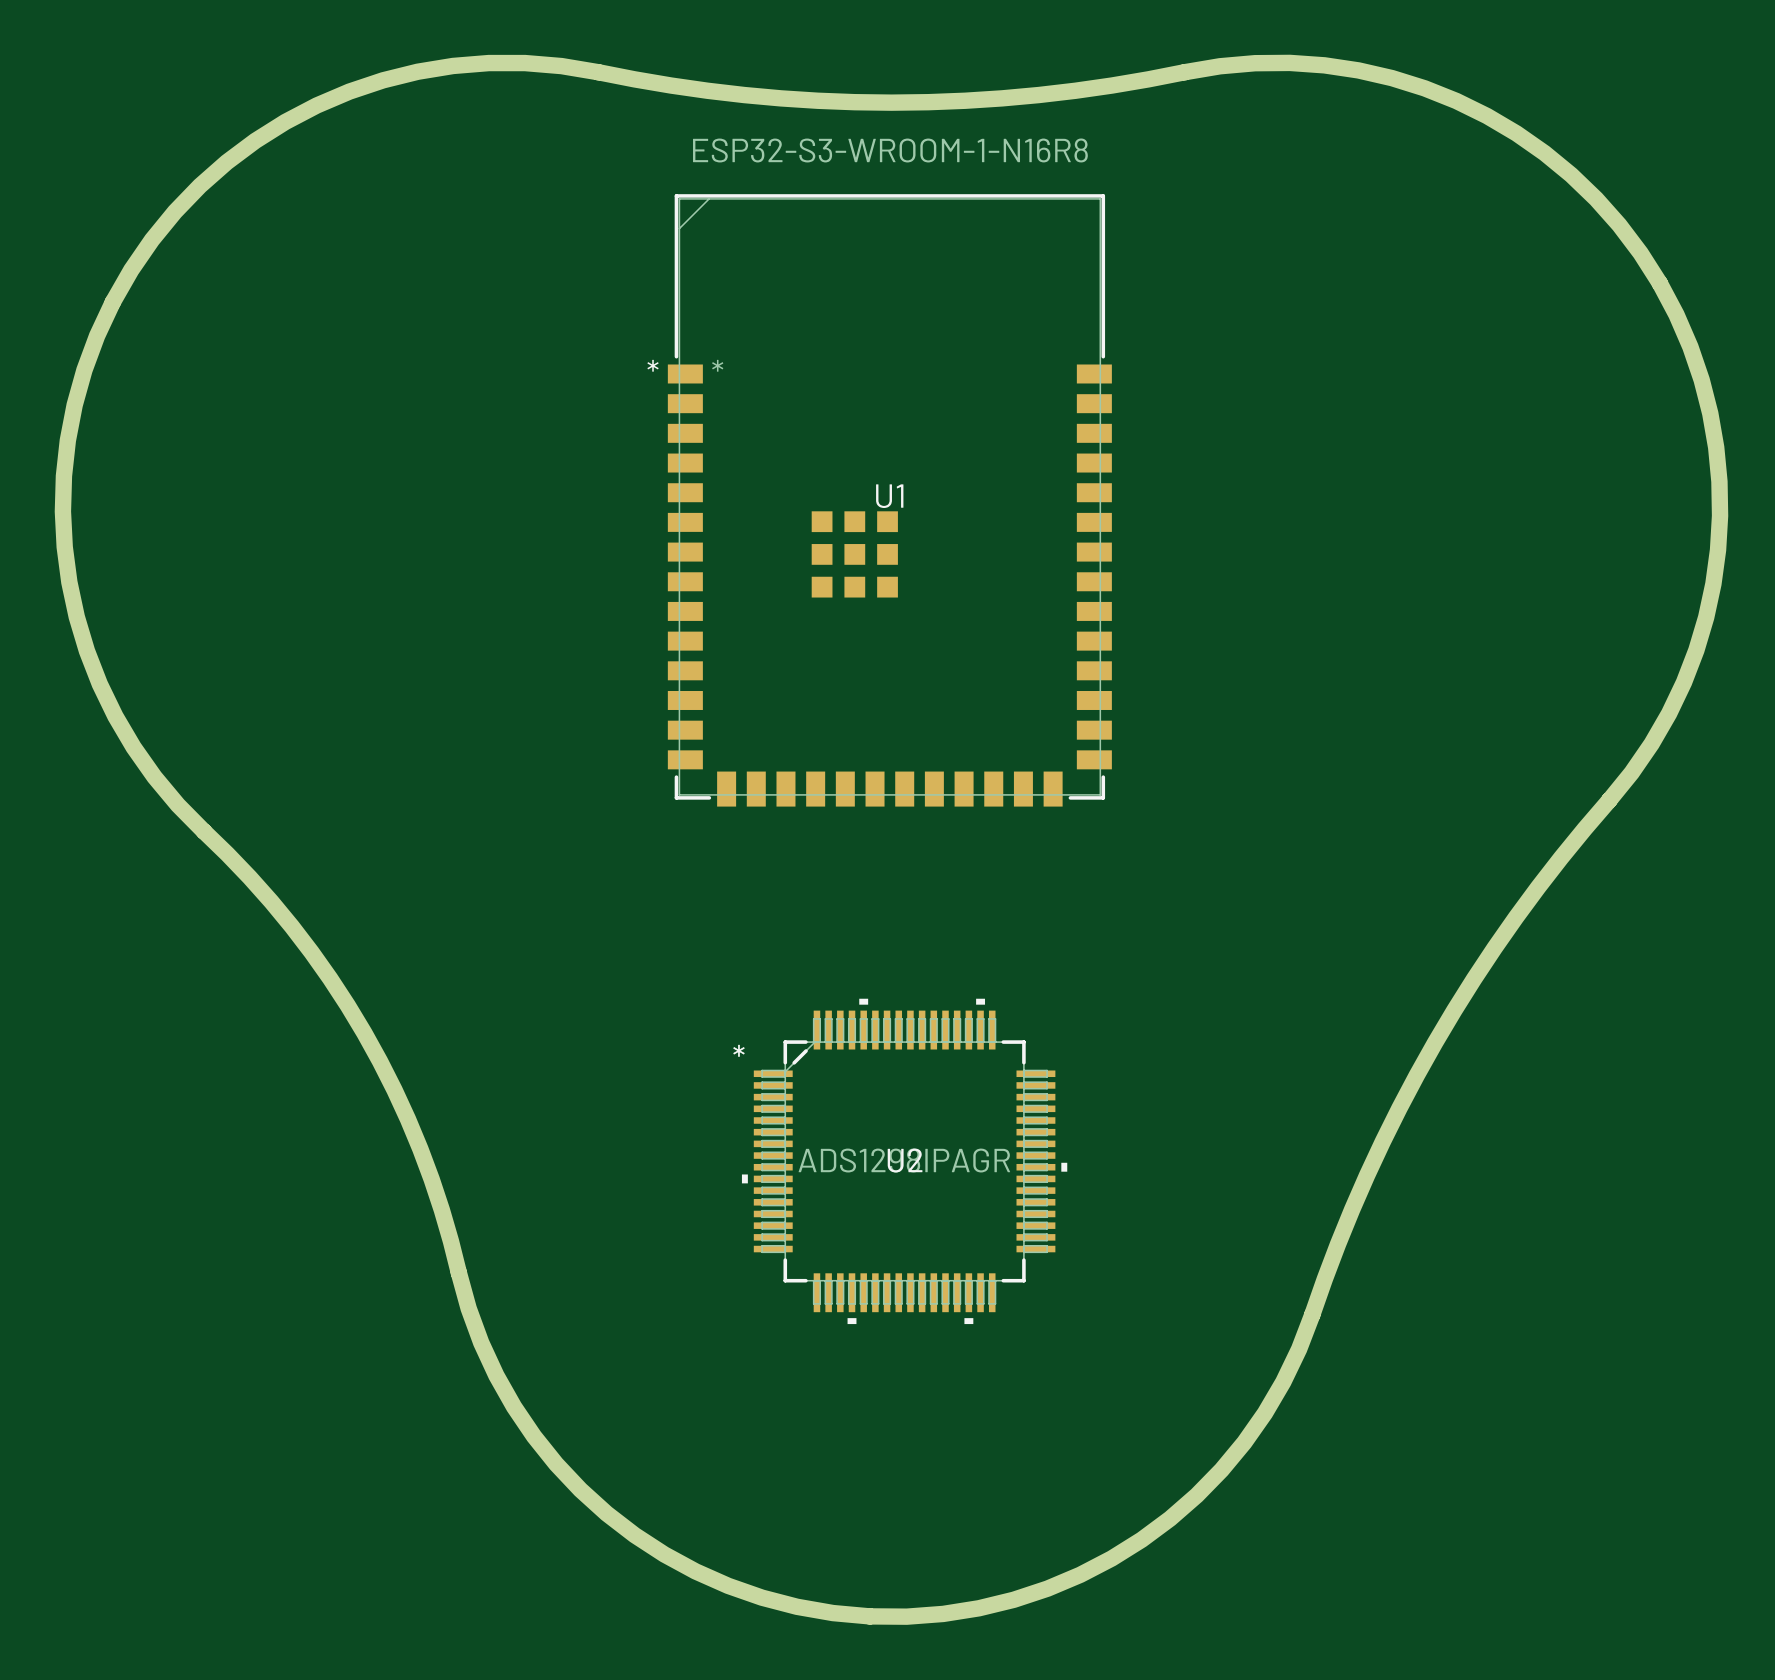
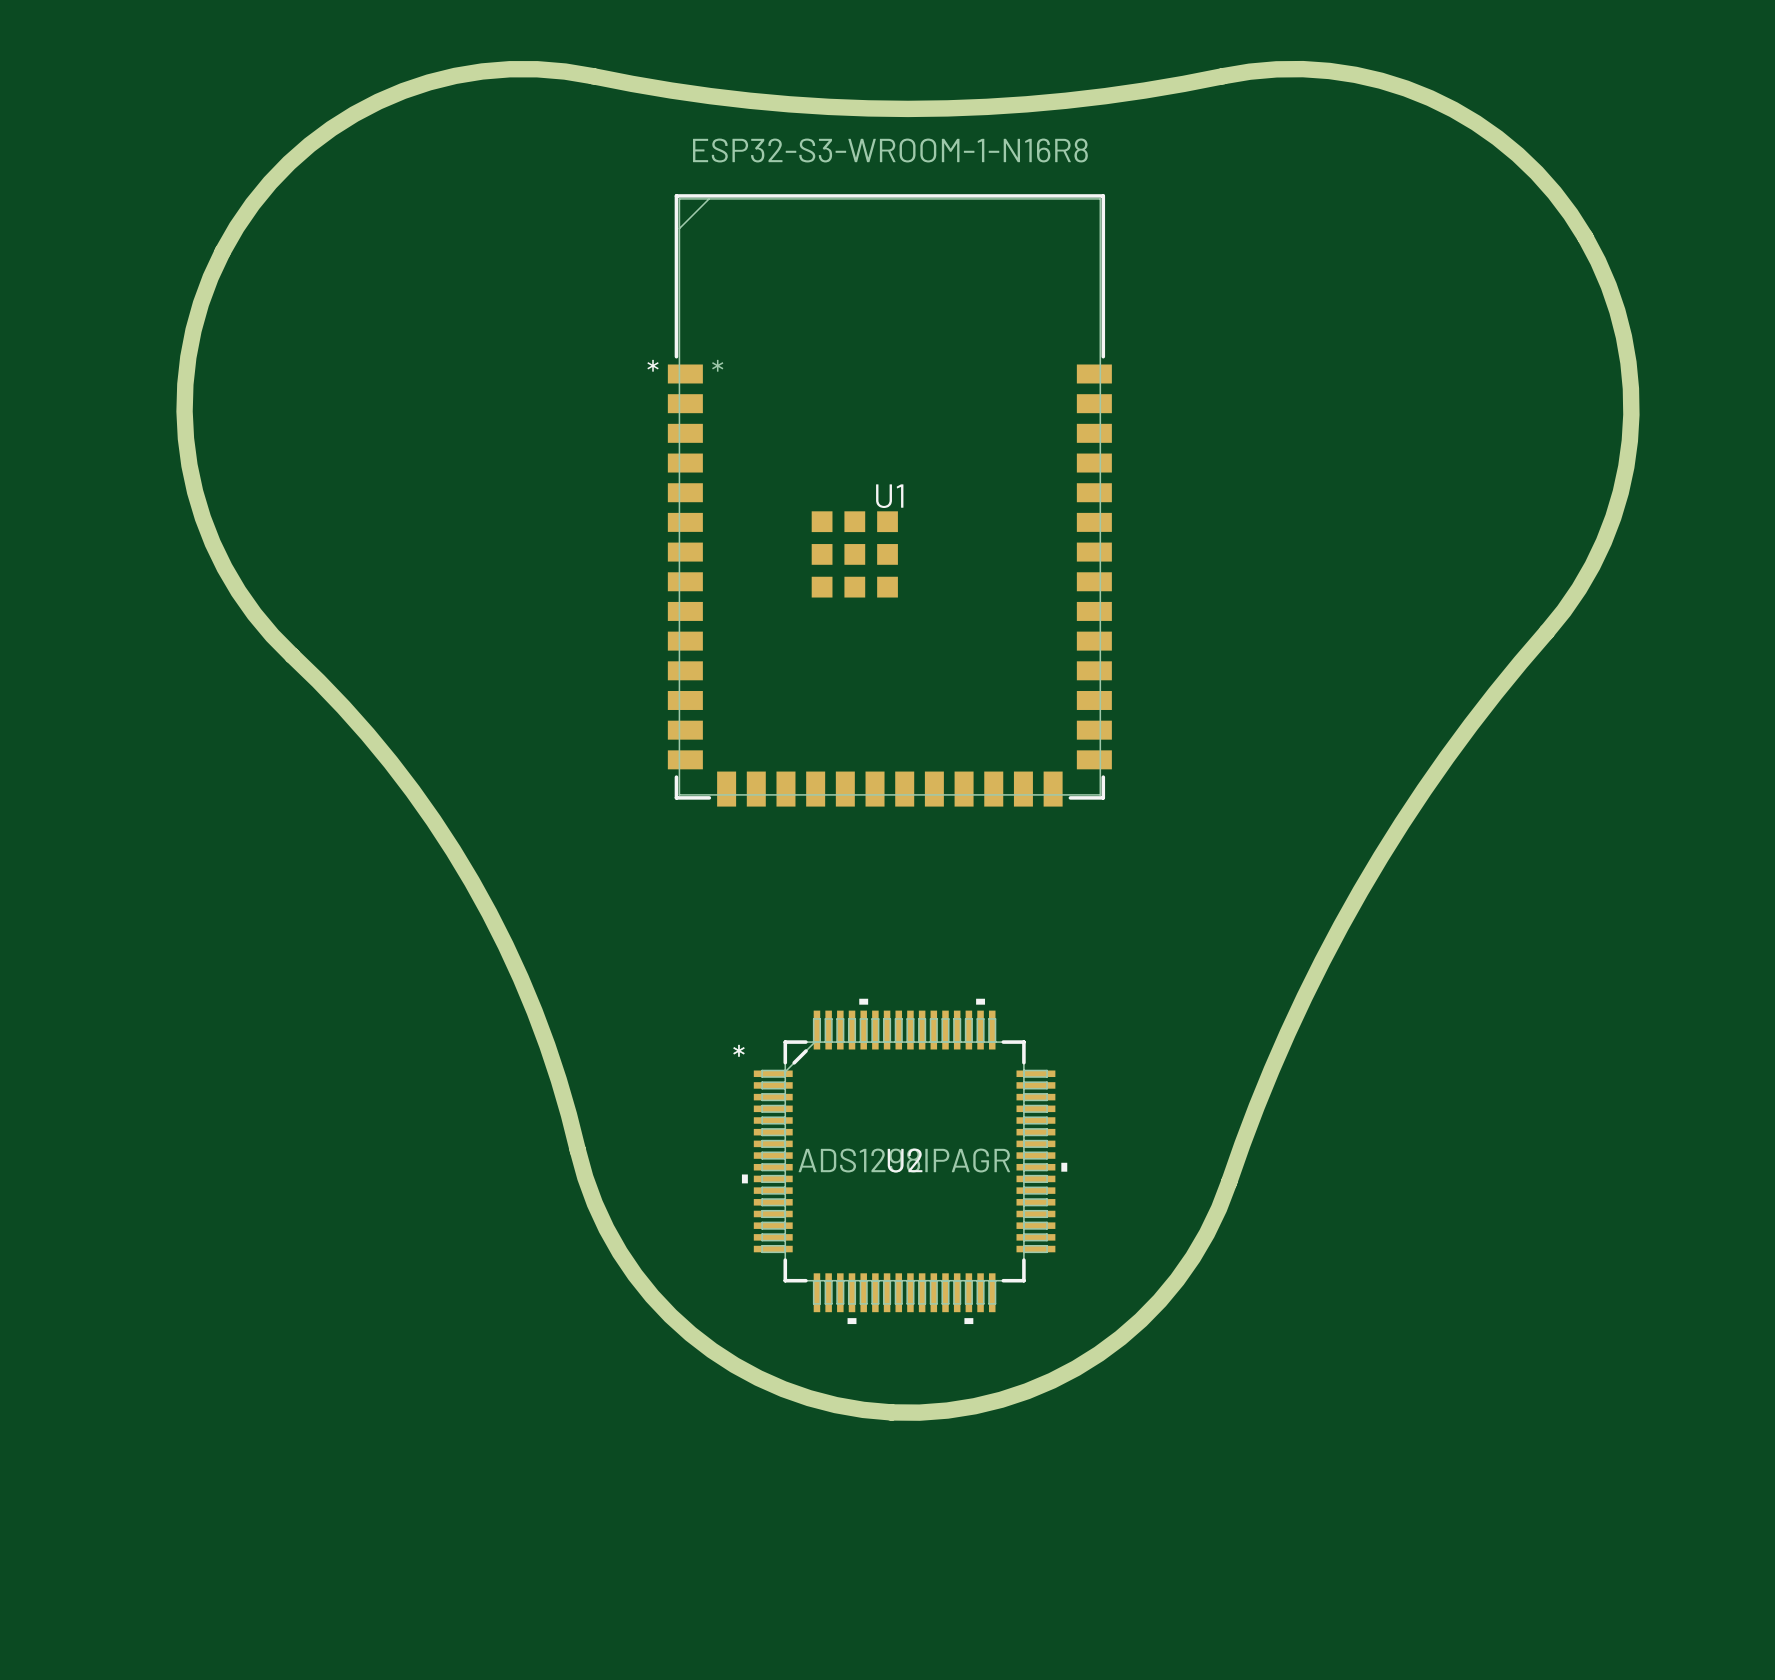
board edge: (598, 72) (671, 85) (744, 95) (817, 100) (891, 102) (965, 100) (1038, 95) (1112, 85) (1219, 66) (1255, 63) (1324, 65) (1391, 78) (1456, 100) (1516, 133) (1571, 174) (1596, 198) (1640, 253) (1659, 283) (1676, 314) (1701, 380) (1716, 447) (1719, 481) (1718, 549) (1706, 617) (1696, 650) (1669, 713) (1631, 772) (1561, 857) (1516, 917) (1474, 979) (1435, 1042) (1399, 1108) (1367, 1175) (1338, 1244) (1299, 1349) (1283, 1381) (1244, 1442) (1196, 1495) (1141, 1539) (1080, 1574) (1013, 1599) (943, 1613) (906, 1616) (869, 1616) (833, 1613) (797, 1606) (762, 1597) (695, 1571) (634, 1535) (580, 1489) (534, 1436) (496, 1375) (468, 1308) (441, 1210) (420, 1149) (394, 1090) (364, 1033) (330, 978) (291, 926) (249, 877) (177, 805) (133, 747) (99, 684) (76, 616) (64, 547) (62, 511) (67, 440) (74, 405) (97, 335) (112, 302) (131, 270) (175, 211) (199, 185) (255, 140) (316, 105) (383, 80) (452, 65) (488, 63) (561, 66) (598, 72) -> (593, 76) (565, 71) (509, 69) (482, 71) (428, 82) (378, 101) (331, 128) (289, 162) (270, 182) (236, 227) (222, 251) (210, 277) (193, 330) (188, 357) (184, 411) (189, 465) (202, 517) (224, 567) (254, 614) (272, 635) (343, 707) (390, 762) (433, 820) (471, 881) (505, 945) (534, 1011) (558, 1080) (585, 1177) (594, 1203) (619, 1252) (652, 1296) (690, 1333) (734, 1365) (783, 1389) (809, 1398) (863, 1409) (891, 1412) (947, 1410) (1001, 1399) (1052, 1380) (1098, 1353) (1140, 1320) (1177, 1279) (1206, 1233) (1219, 1208) (1256, 1106) (1287, 1033) (1322, 961) (1360, 891) (1402, 823) (1447, 757) (1495, 693) (1563, 610) (1592, 565) (1613, 517) (1620, 492) (1629, 440) (1630, 388) (1628, 362) (1617, 311) (1598, 261) (1585, 237) (1554, 192) (1517, 154) (1497, 137) (1453, 109) (1405, 88) (1355, 74) (1303, 69) (1276, 69) (1249, 71) (1144, 90) (1066, 100) (987, 106) (908, 108) (828, 106) (749, 100) (671, 90) (593, 76)

